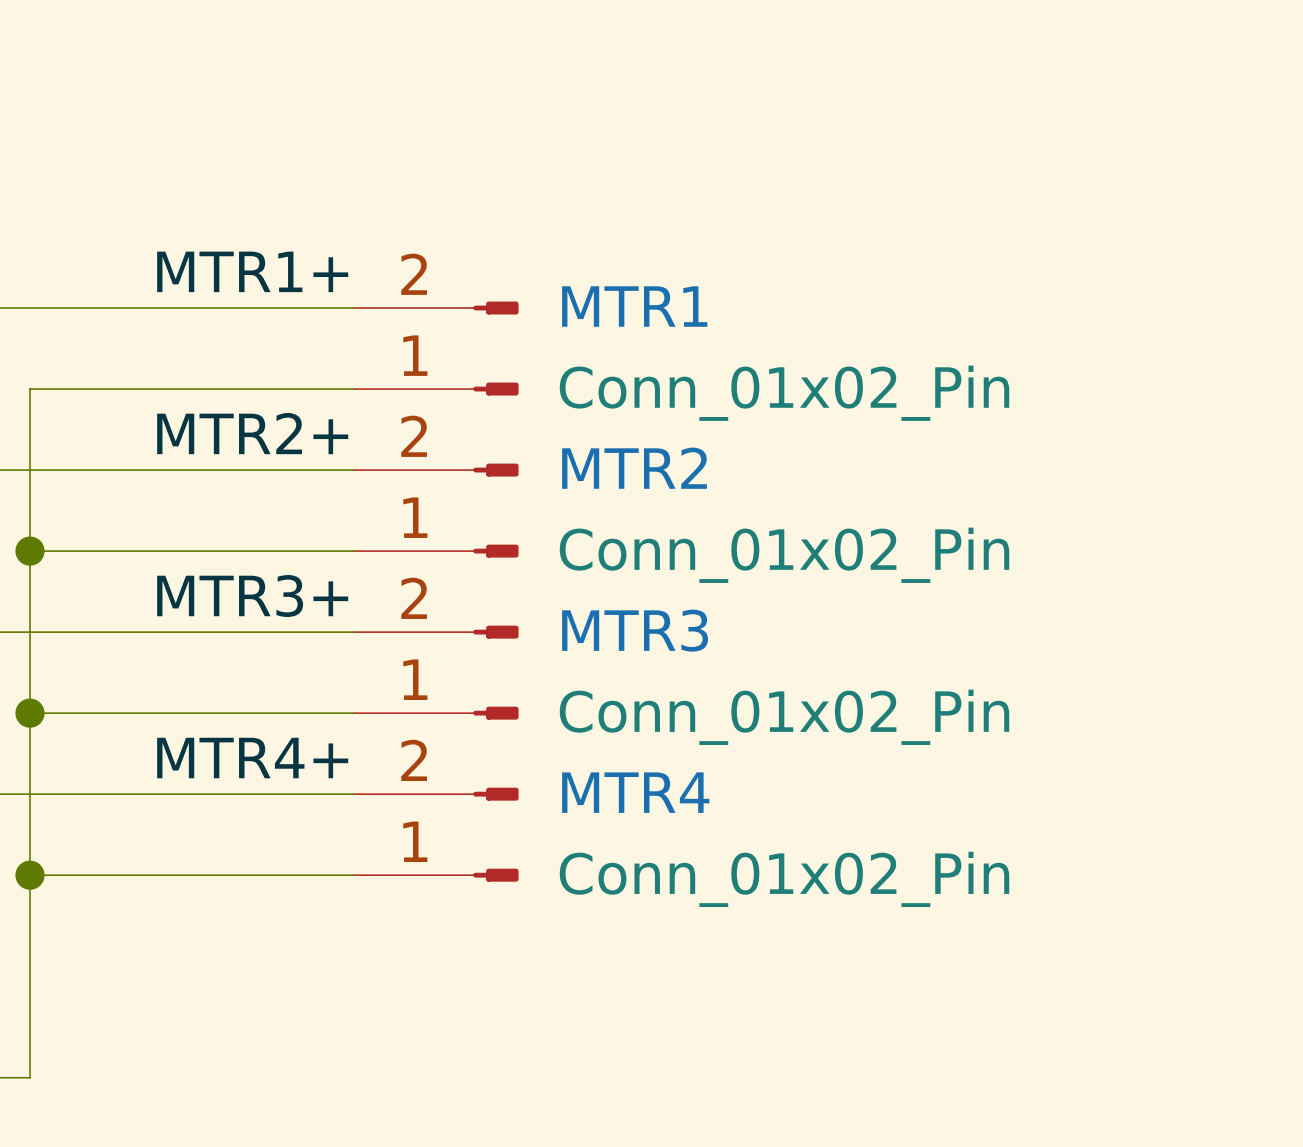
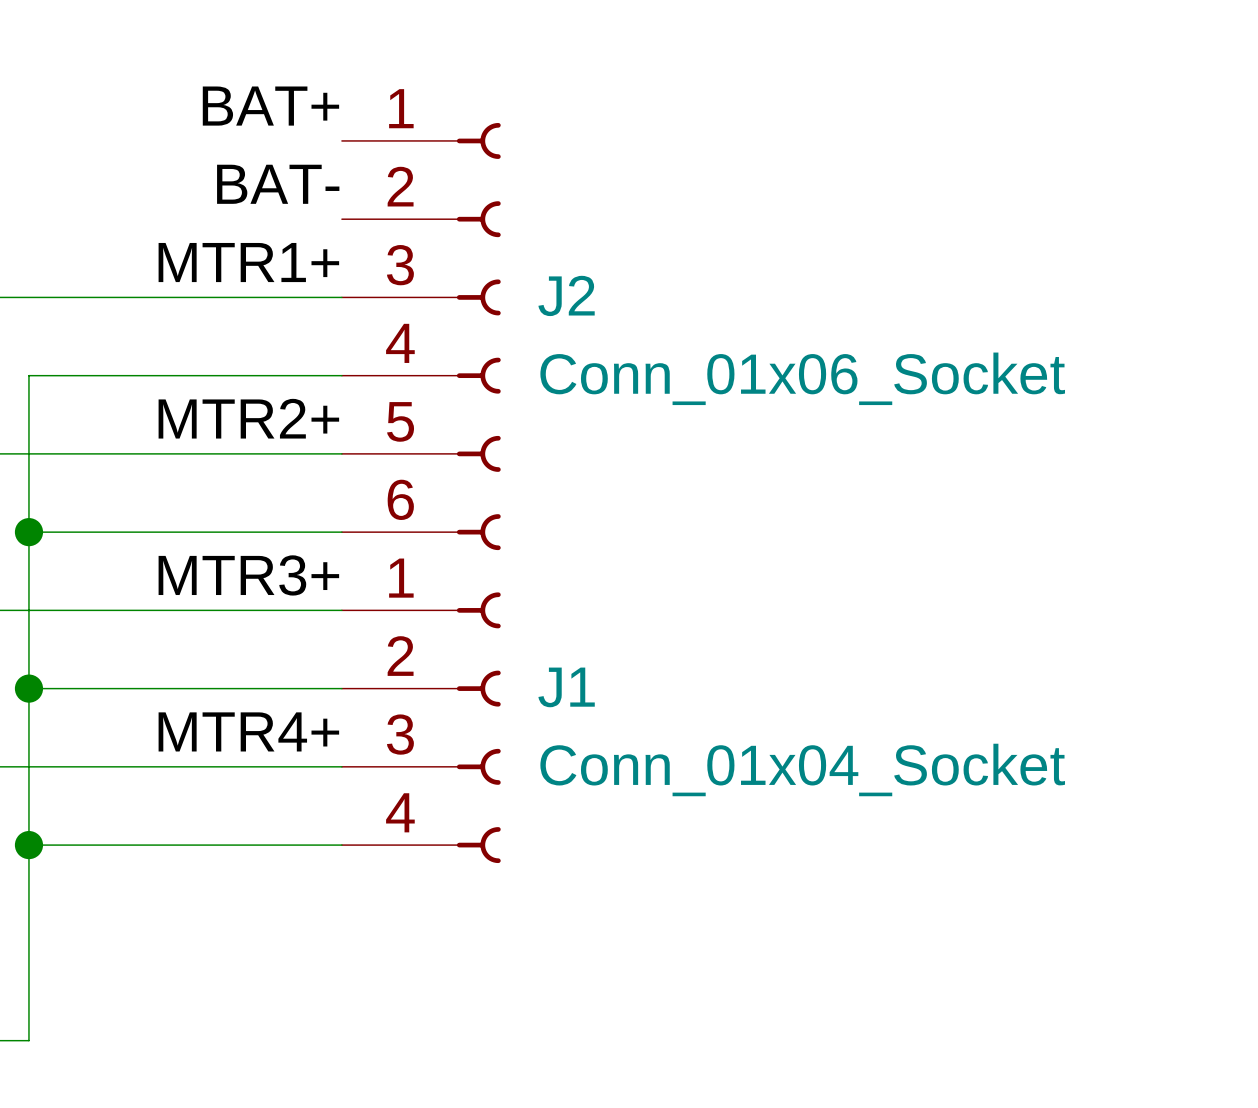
label: none -> BAT+ (270, 106)
label: none -> BAT- (278, 184)
MTR1: Conn_01x02_Pin (436, 348) -> none
J2: none -> Conn_01x06_Socket (421, 336)
MTR2: Conn_01x02_Pin (436, 510) -> none
MTR3: Conn_01x02_Pin (436, 672) -> none
J1: none -> Conn_01x04_Socket (421, 727)
MTR4: Conn_01x02_Pin (436, 834) -> none

